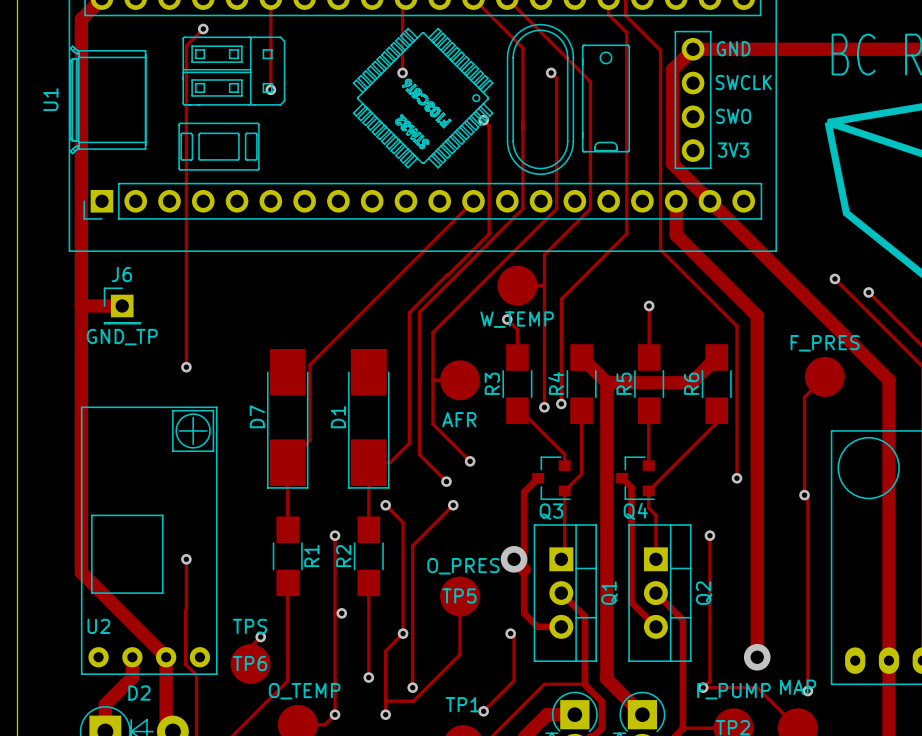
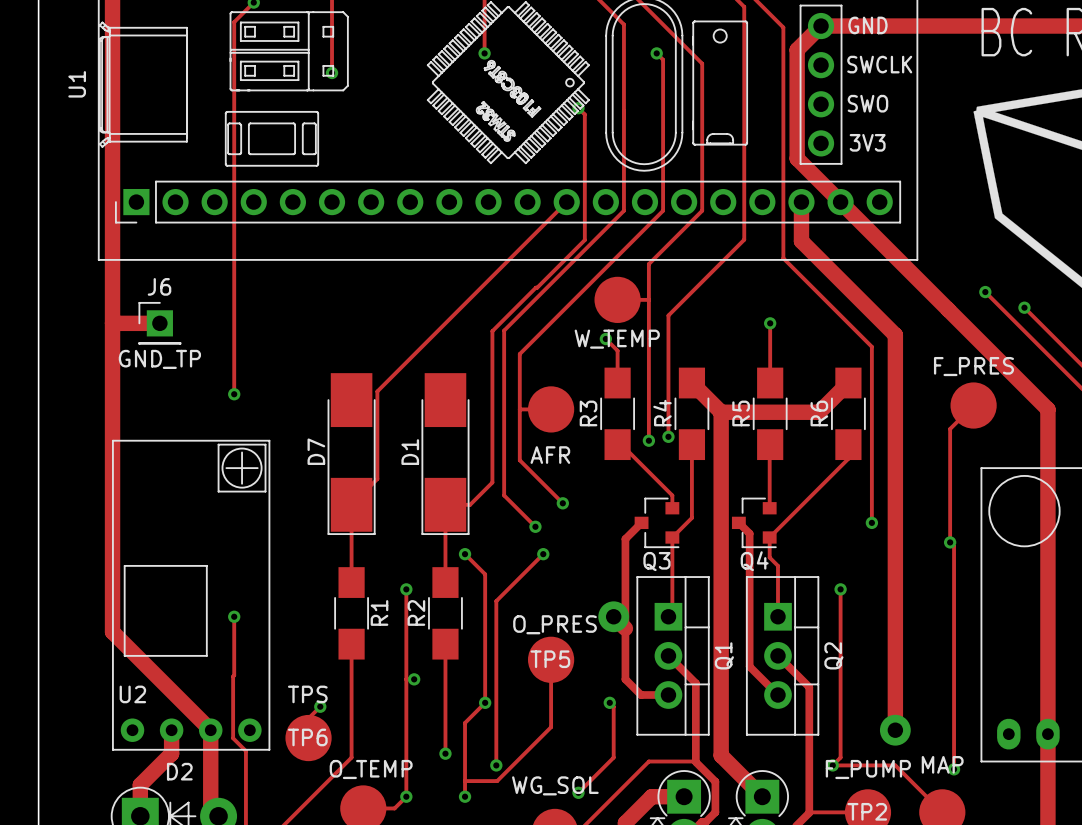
TP1 name: TP1 (462, 704) -> WG_SOL (555, 785)

